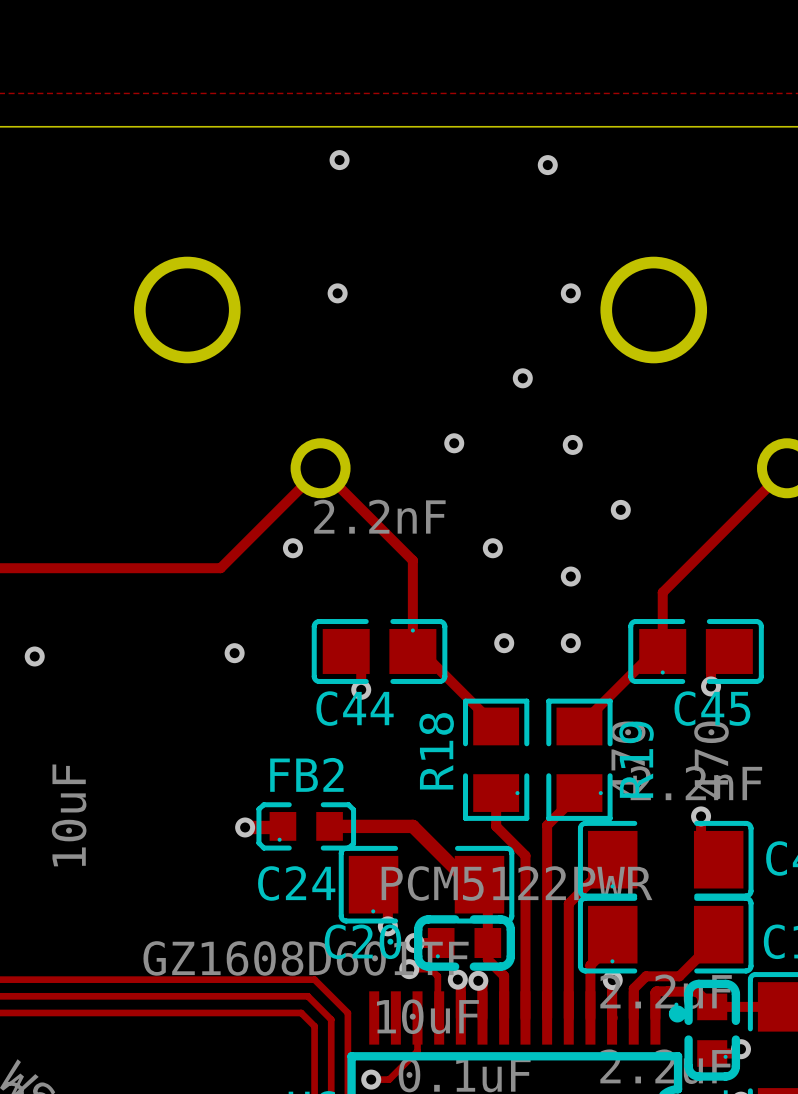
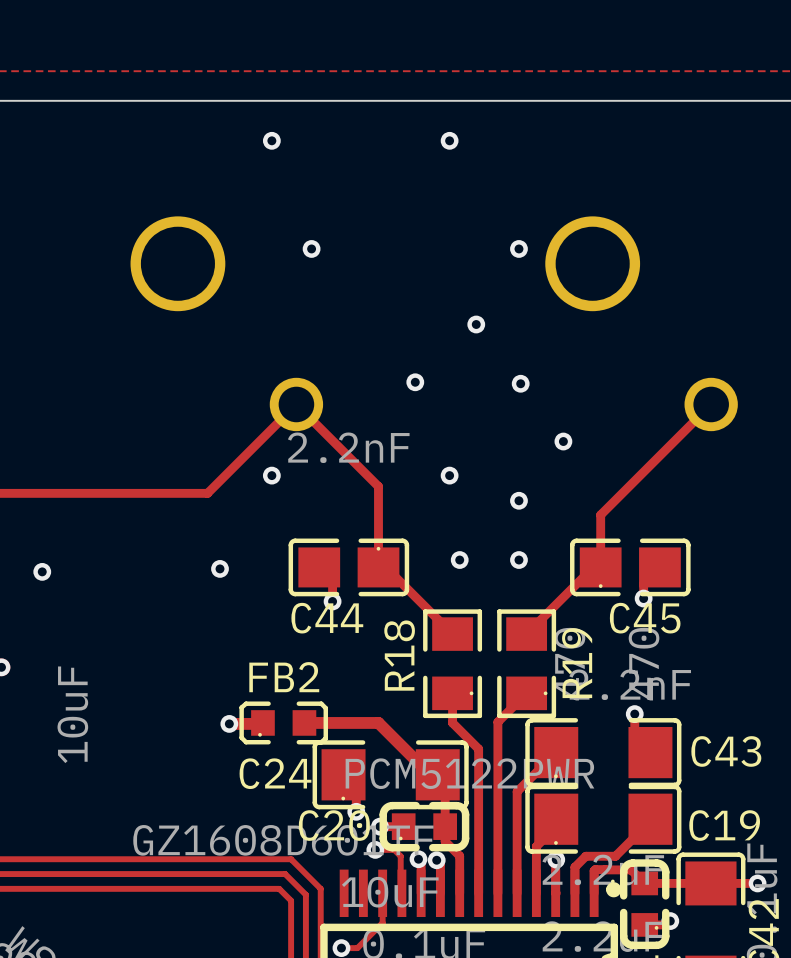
via position: (339, 160) -> (271, 140)
via position: (547, 165) -> (449, 140)

